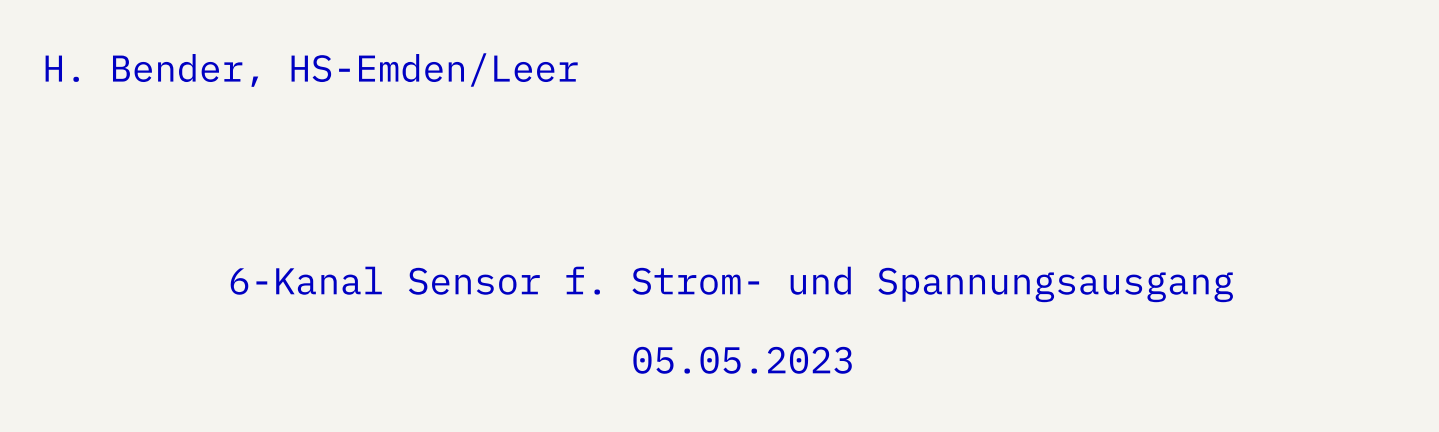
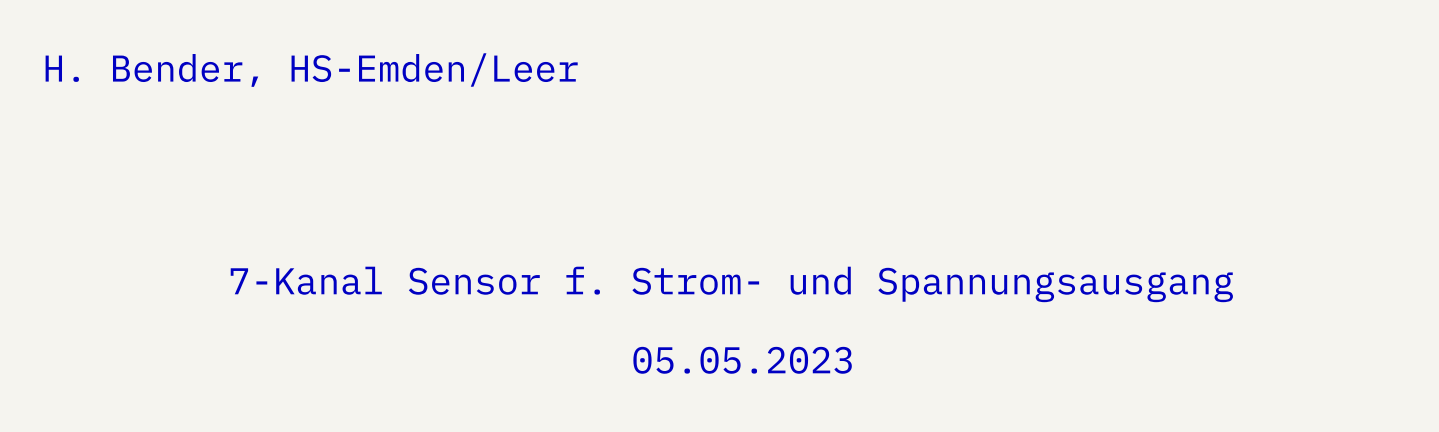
text: 6-Kanal Sensor f. Strom- und Spannungsausgang (731, 284) -> 7-Kanal Sensor f. Strom- und Spannungsausgang (731, 284)

